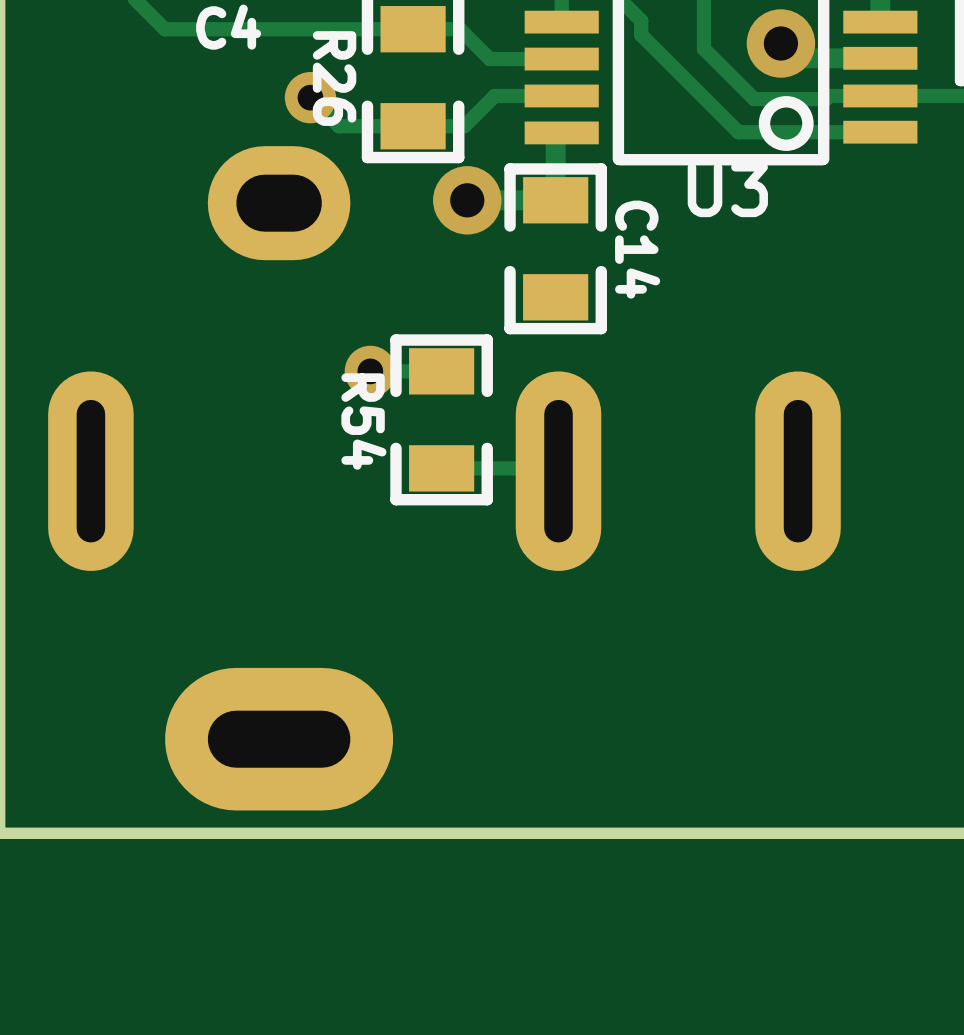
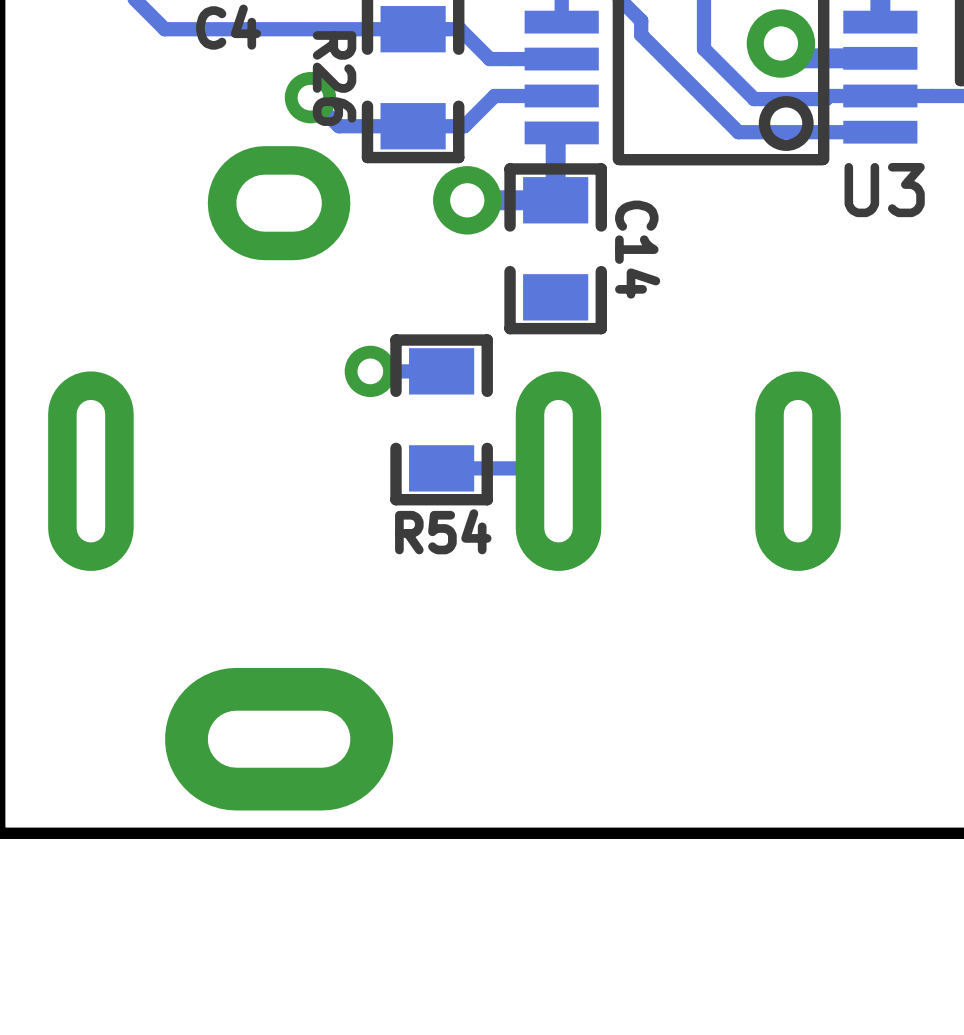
U3 name position: U3 (727, 190) -> U3 (884, 190)
R54 name rotation: 0° (363, 421) -> 90° counterclockwise (443, 531)
R54 name position: R54 (363, 421) -> R54 (443, 531)

